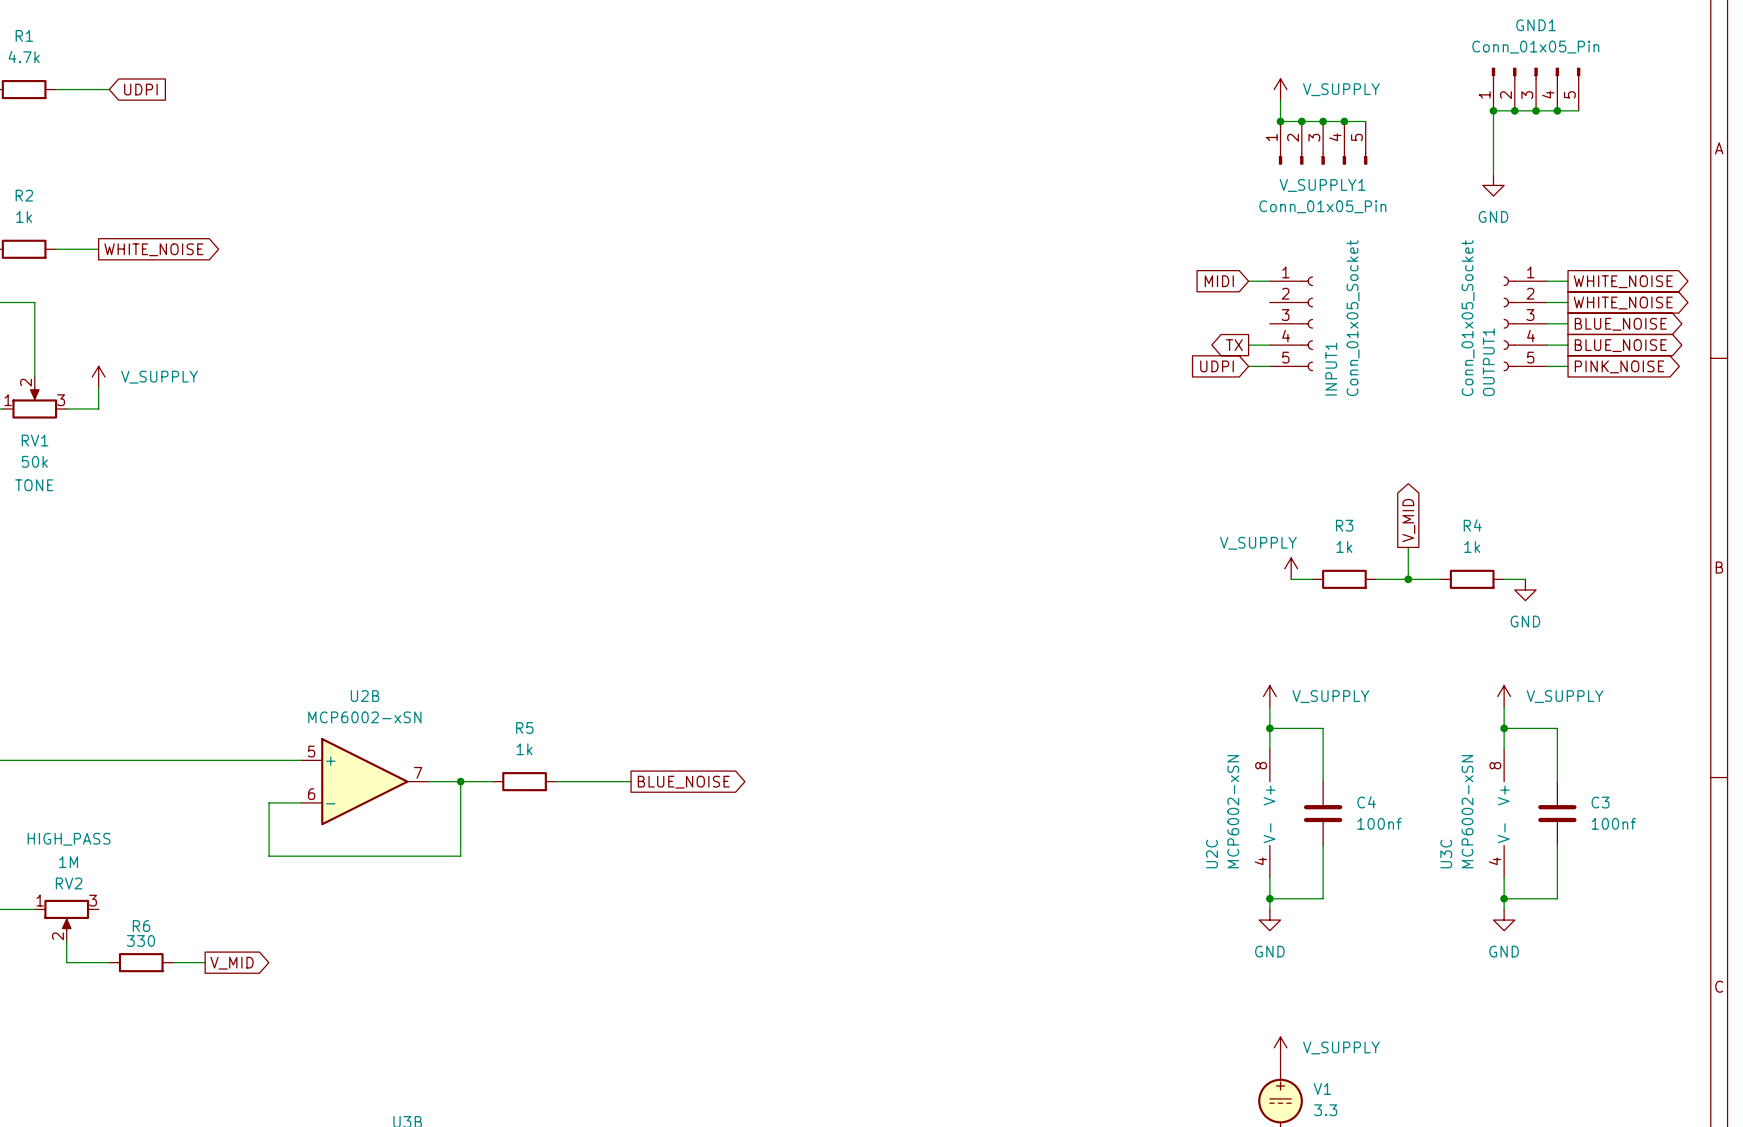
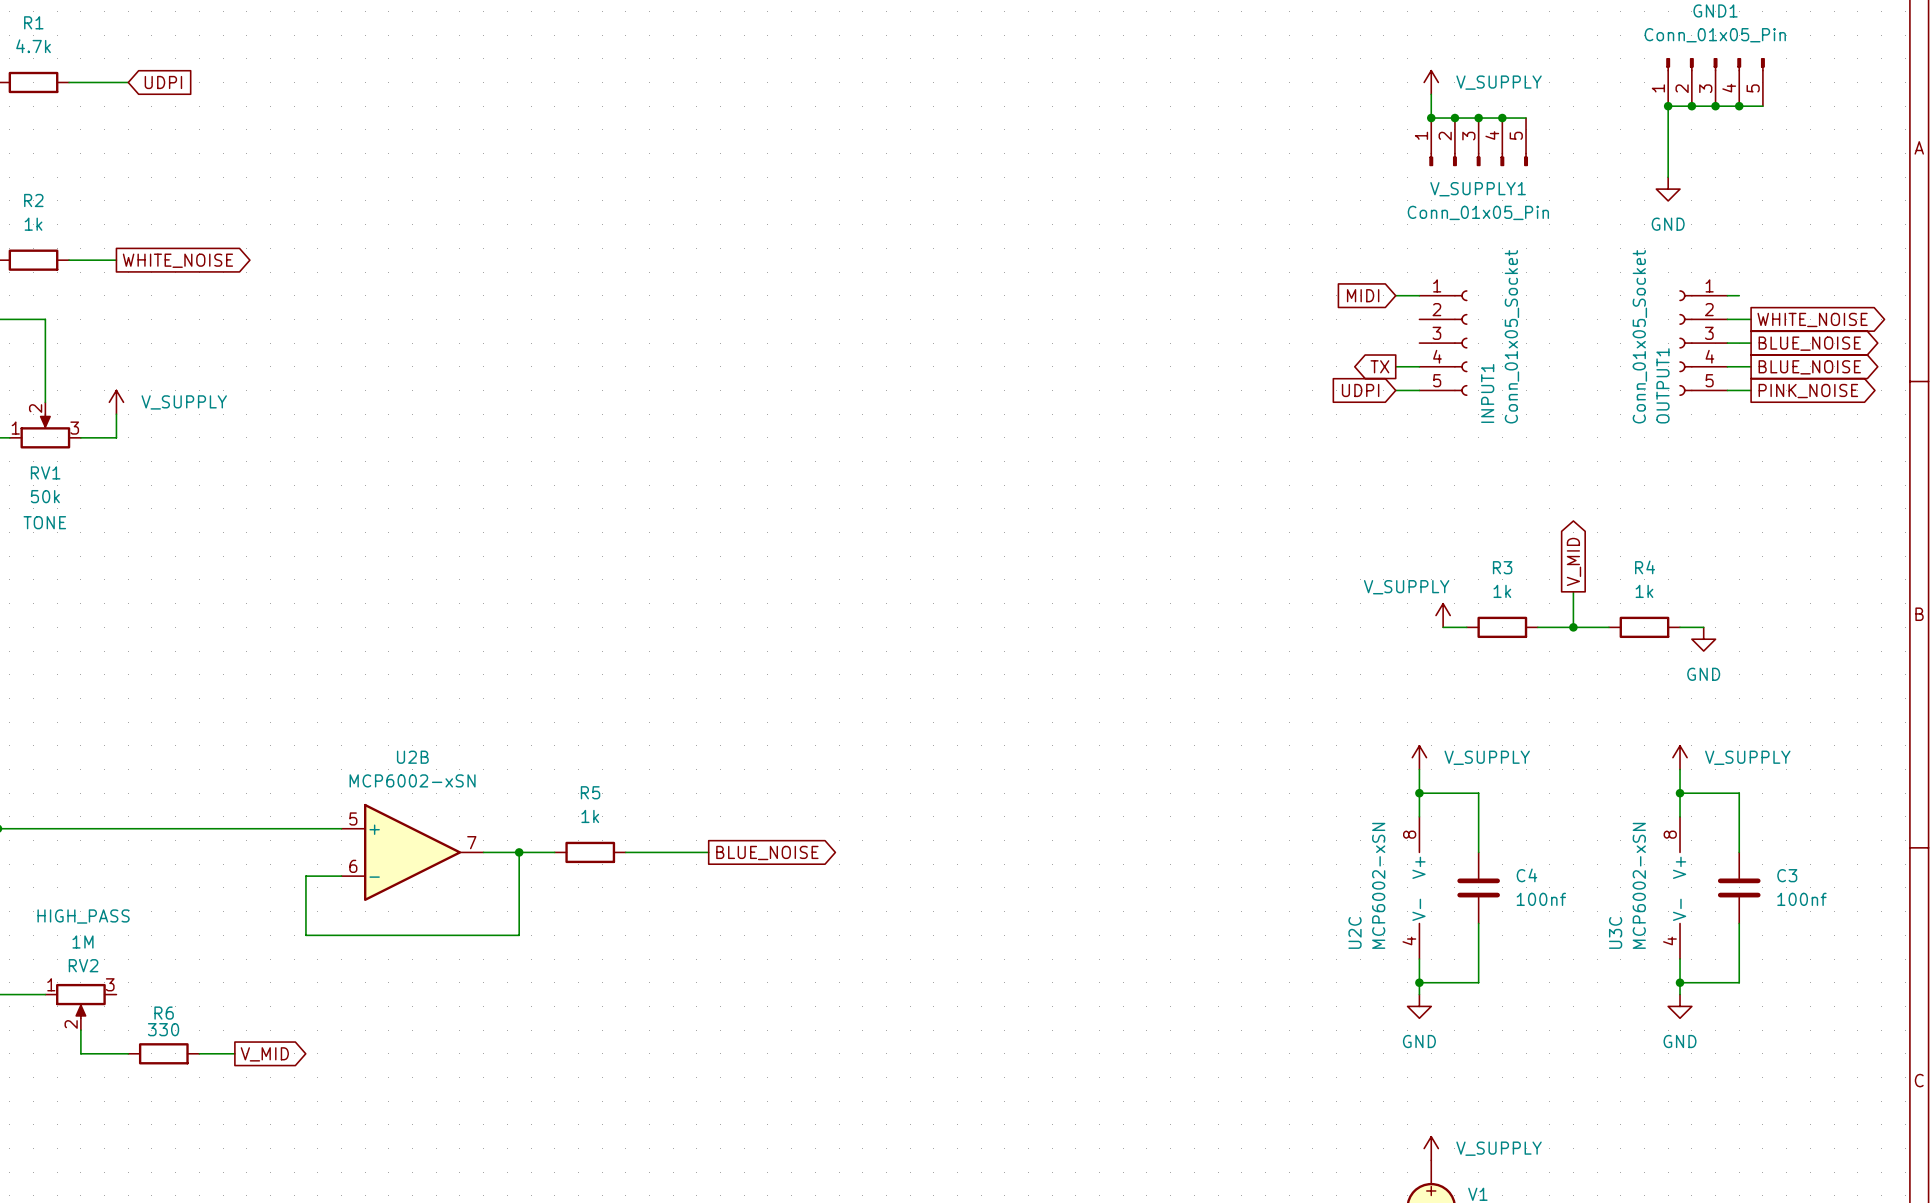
wire: (1557, 281) (1568, 281) -> none
global label: WHITE_NOISE (1623, 281) -> none

